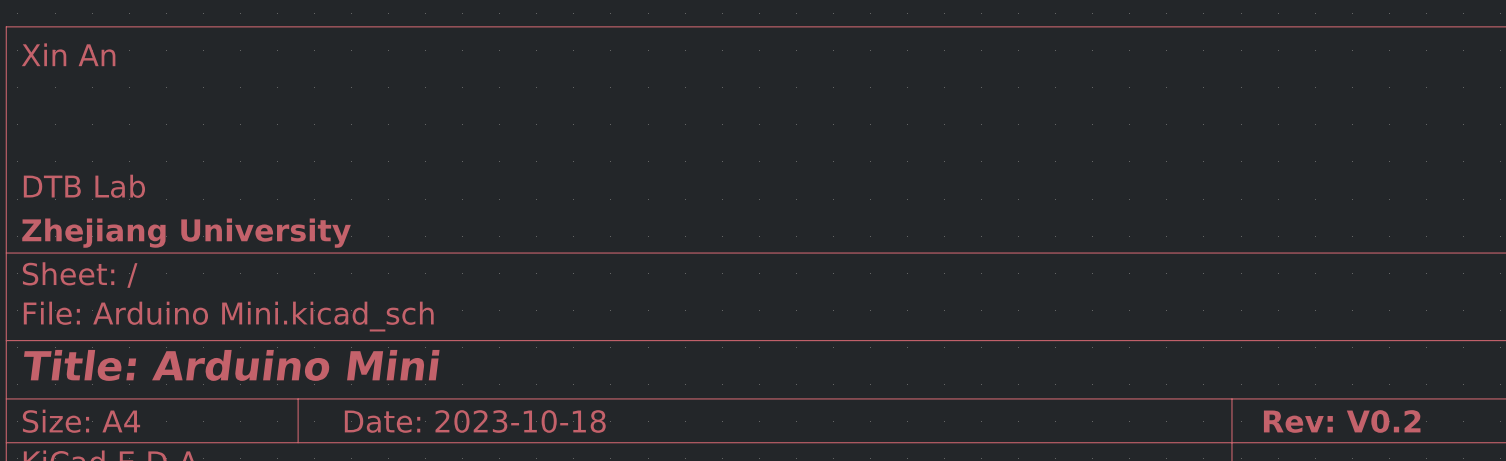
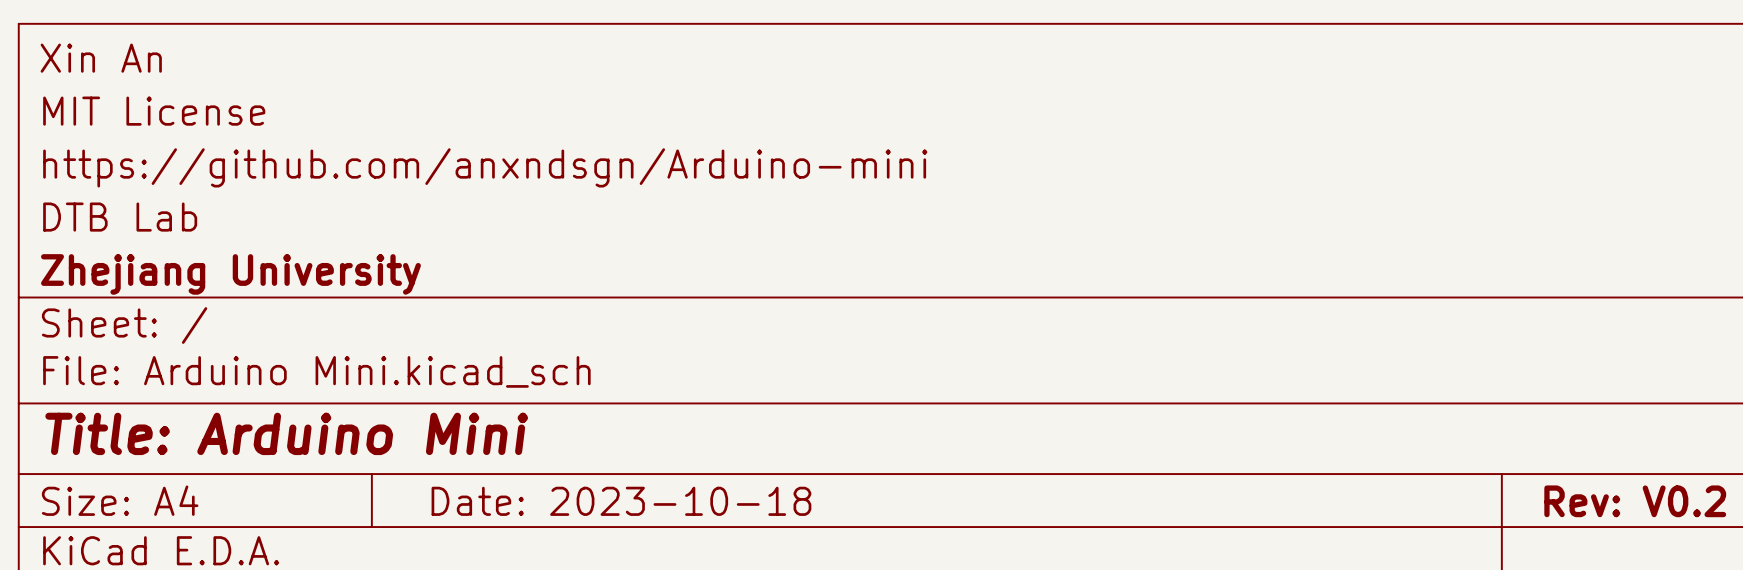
title block: none -> MIT License (154, 111)
title block: none -> https://github.com/anxndsgn/Arduino-mini (485, 167)

